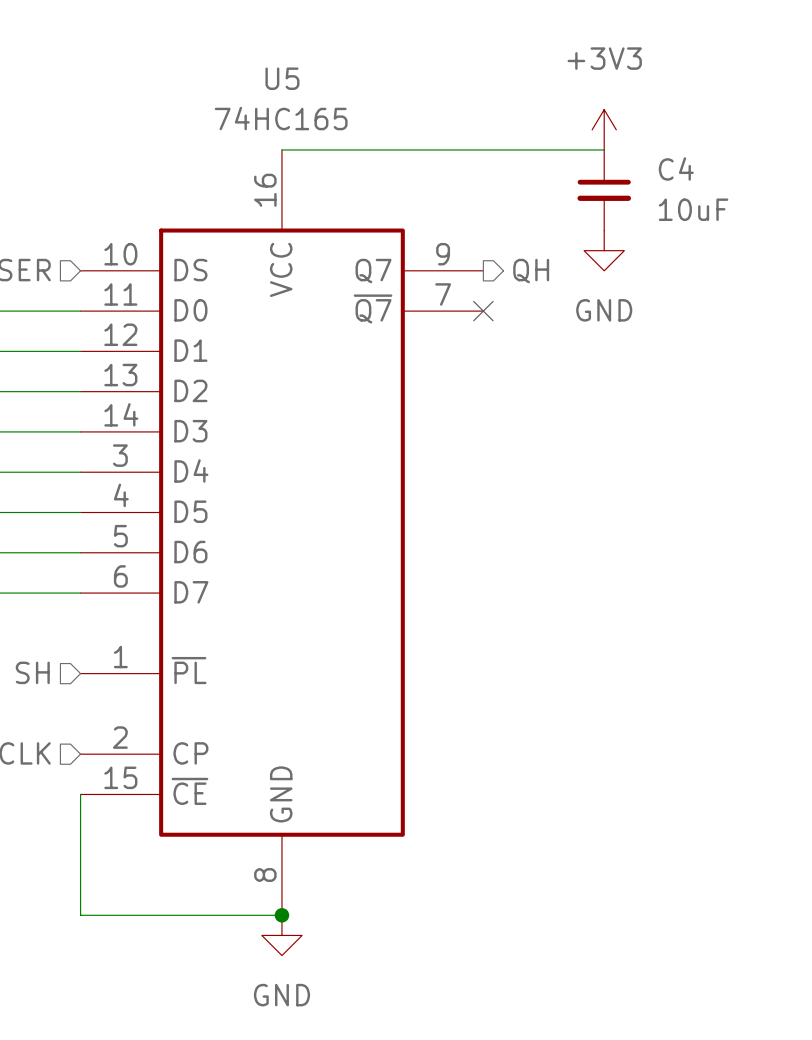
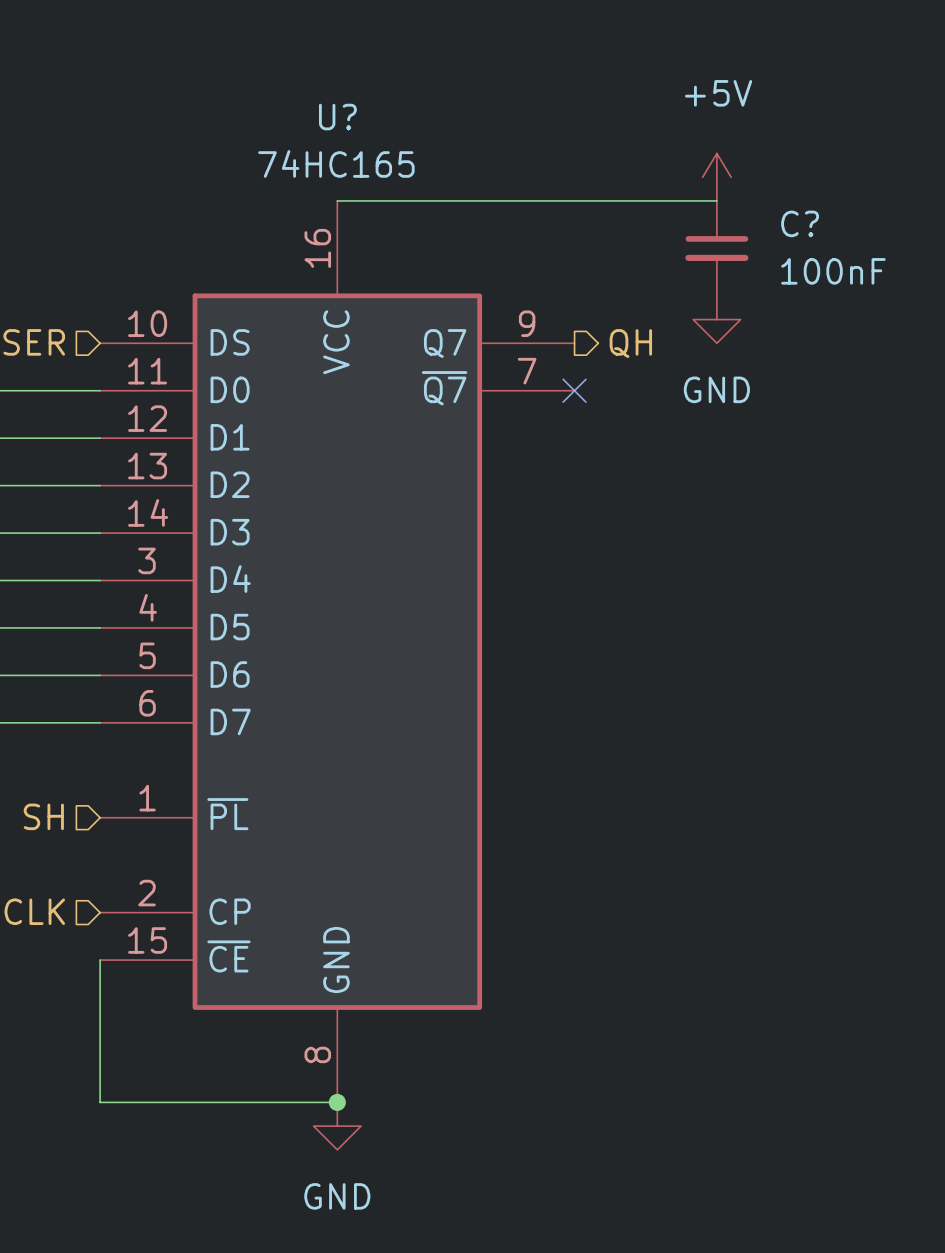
U5 name: U5 (282, 78) -> U? (337, 117)
power symbol: +3V3 (604, 129) -> +5V (716, 177)
C4 name: C4 (676, 168) -> C? (800, 223)
C4 value: 10uF (693, 209) -> 100nF (833, 271)

